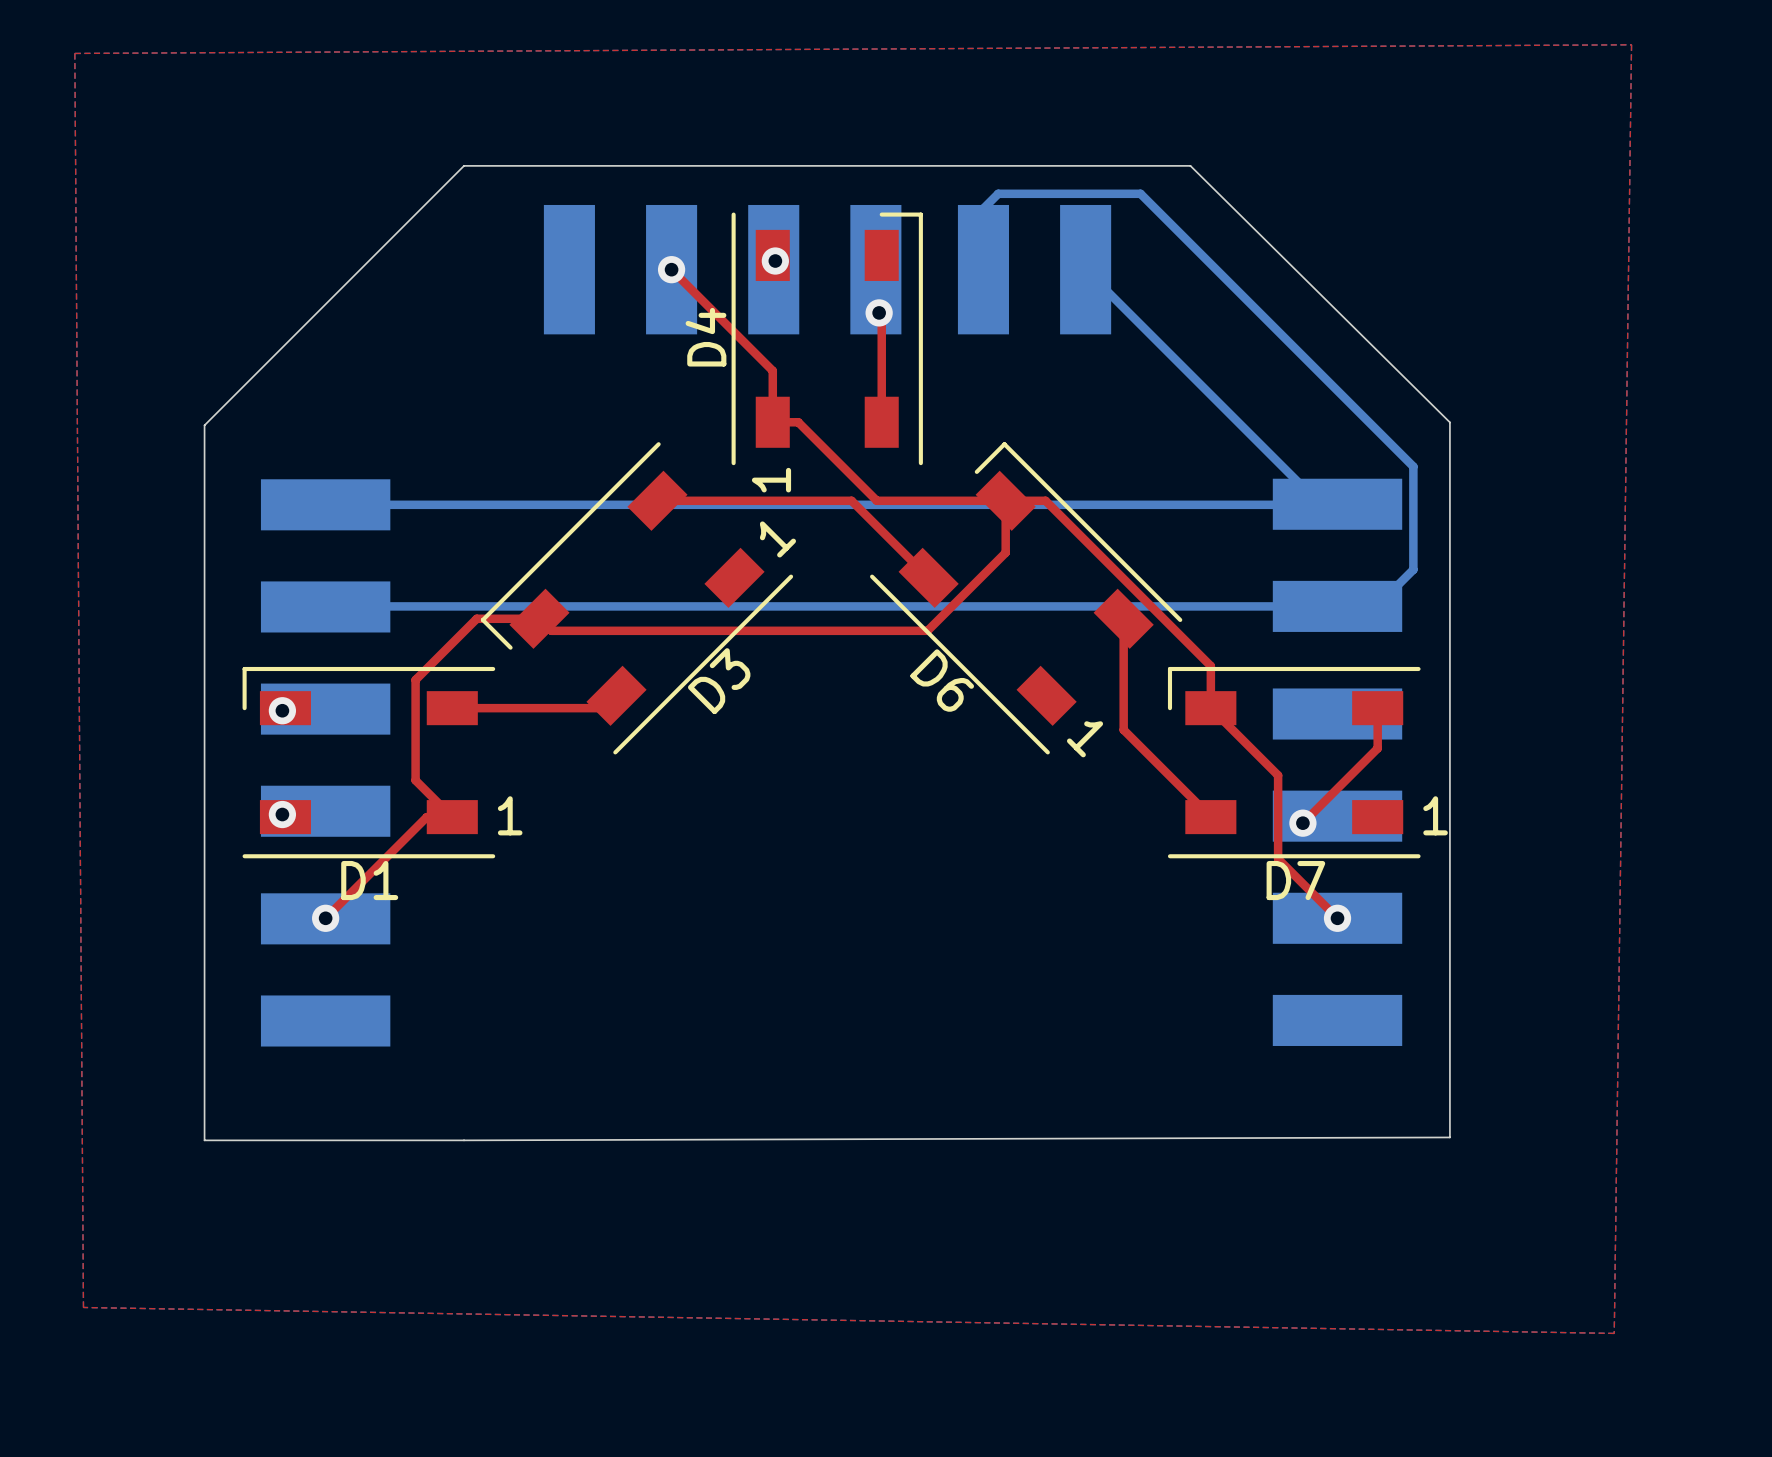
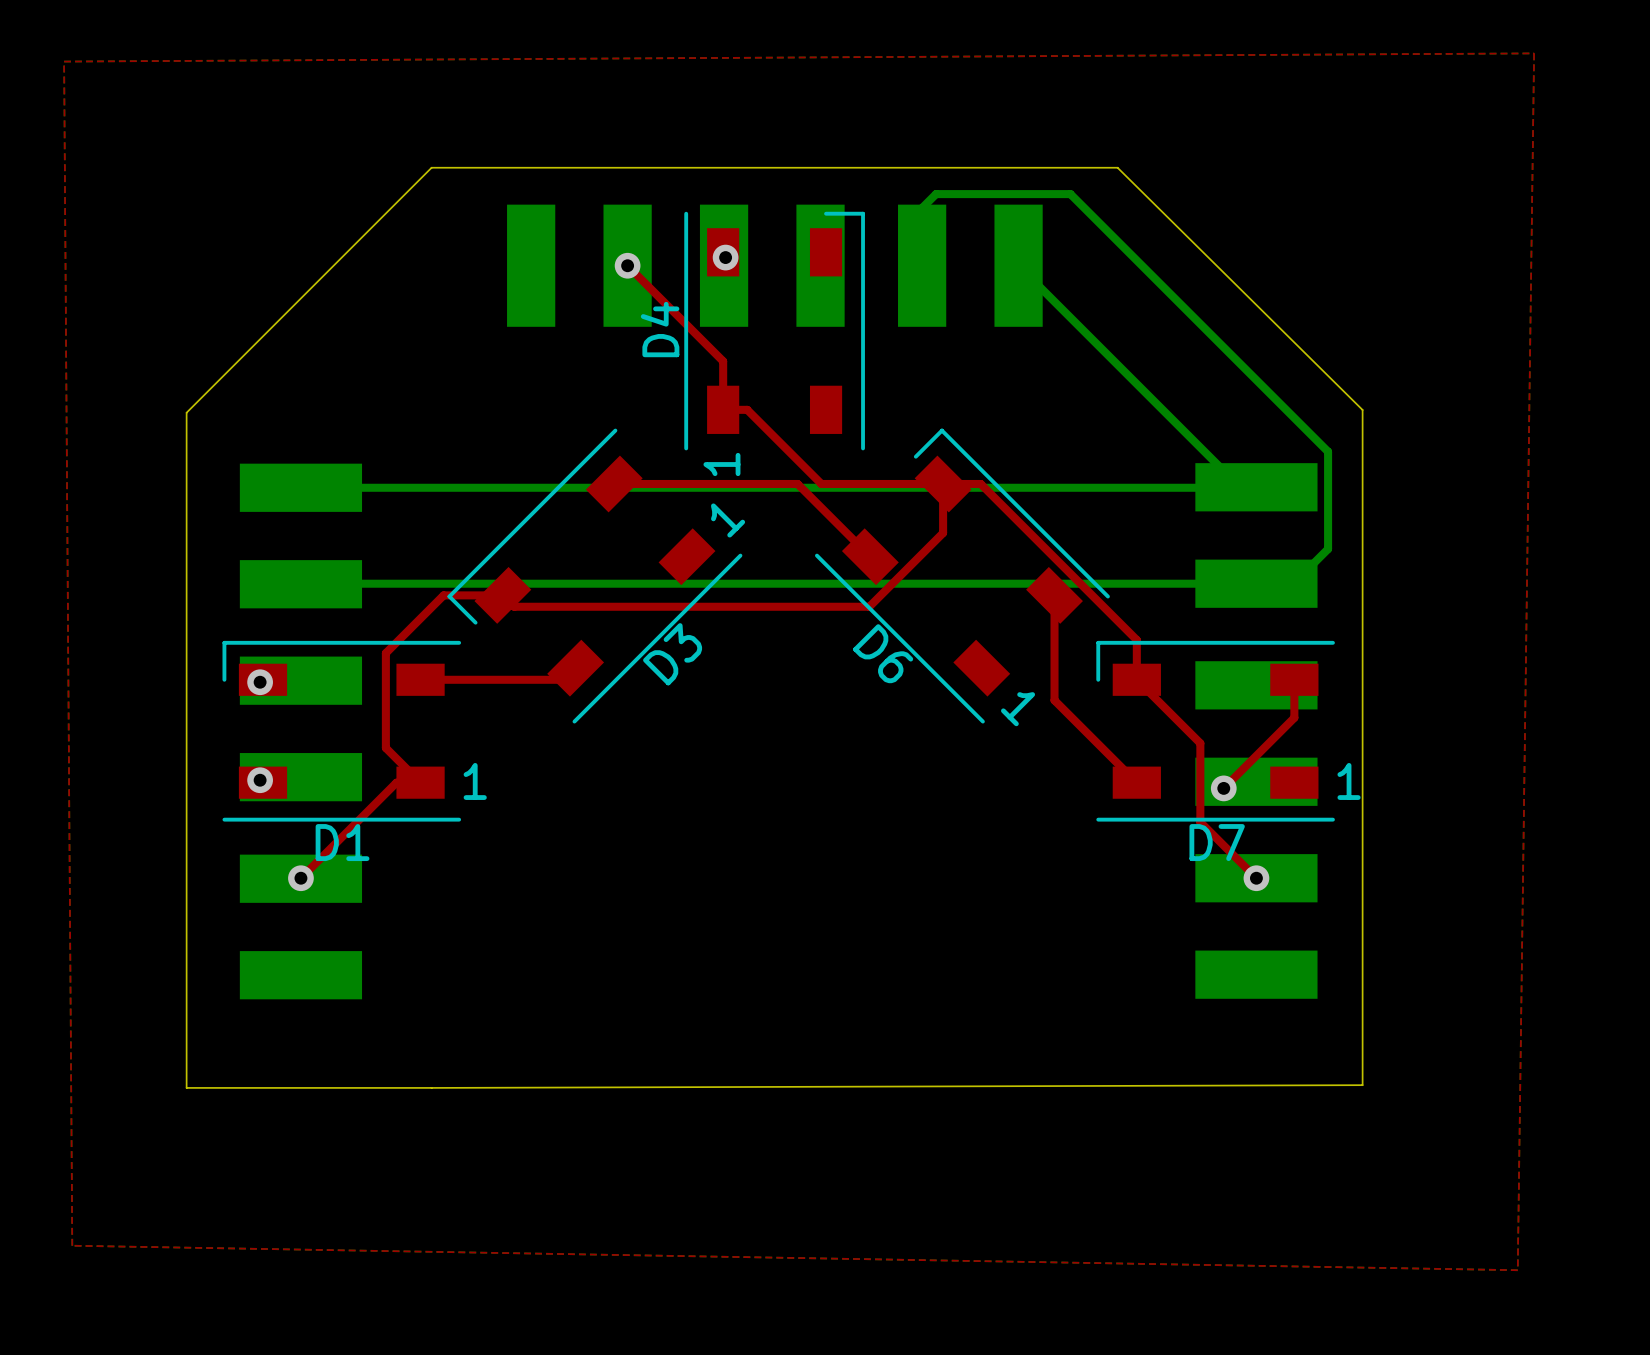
top track: (879, 312) (881, 315) (881, 422) -> none
via: (879, 312) -> none

